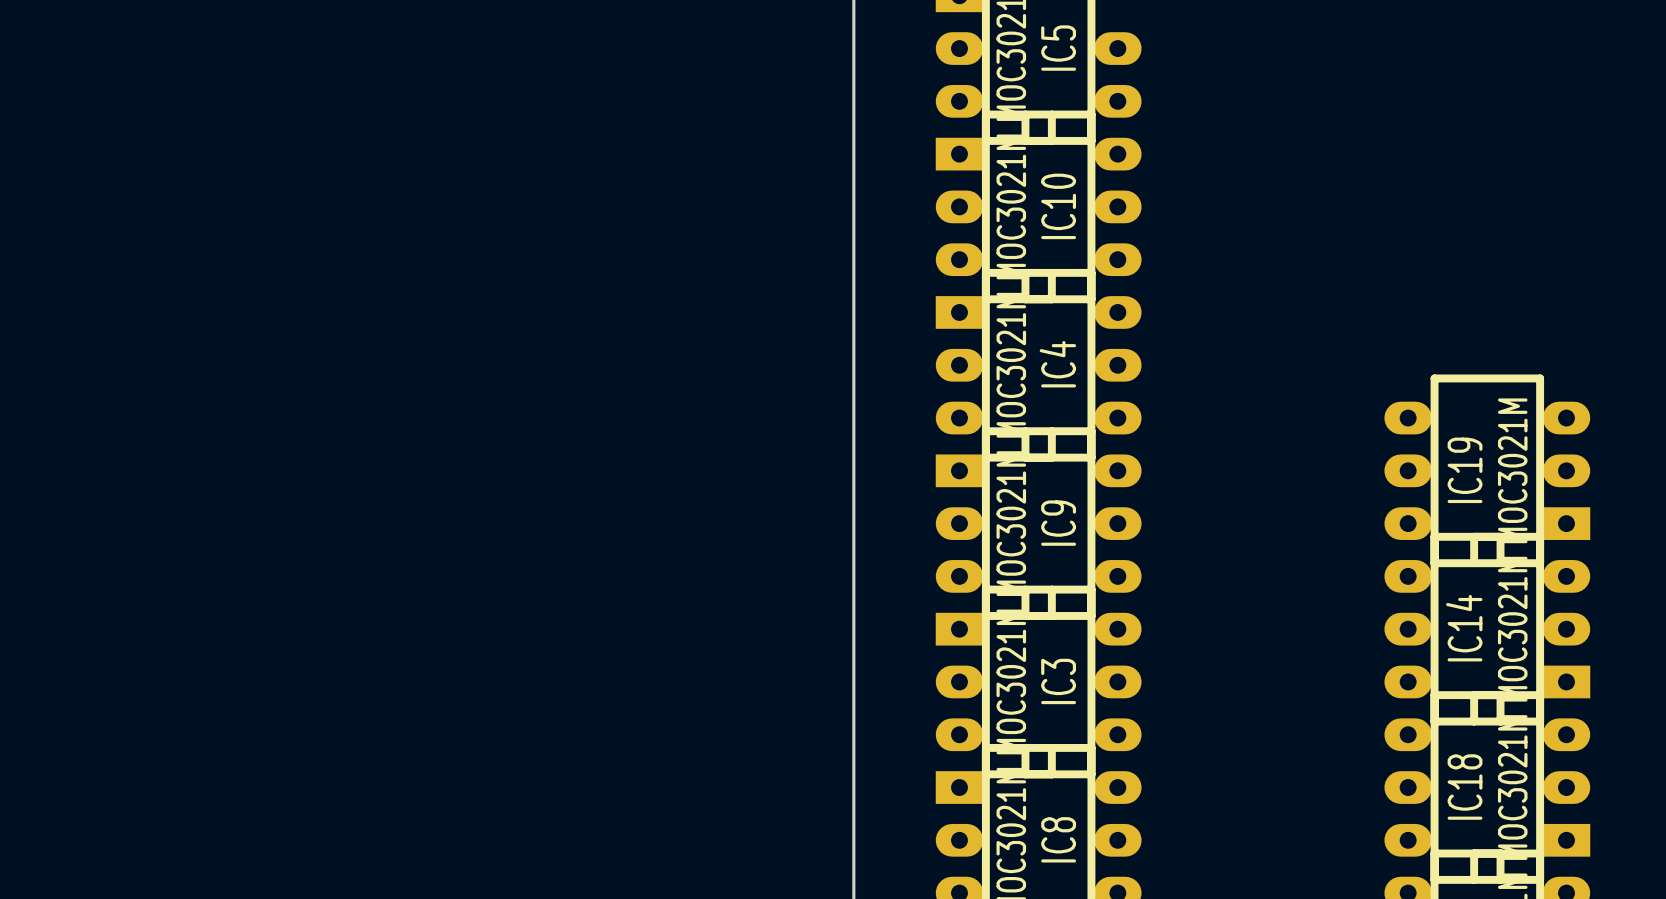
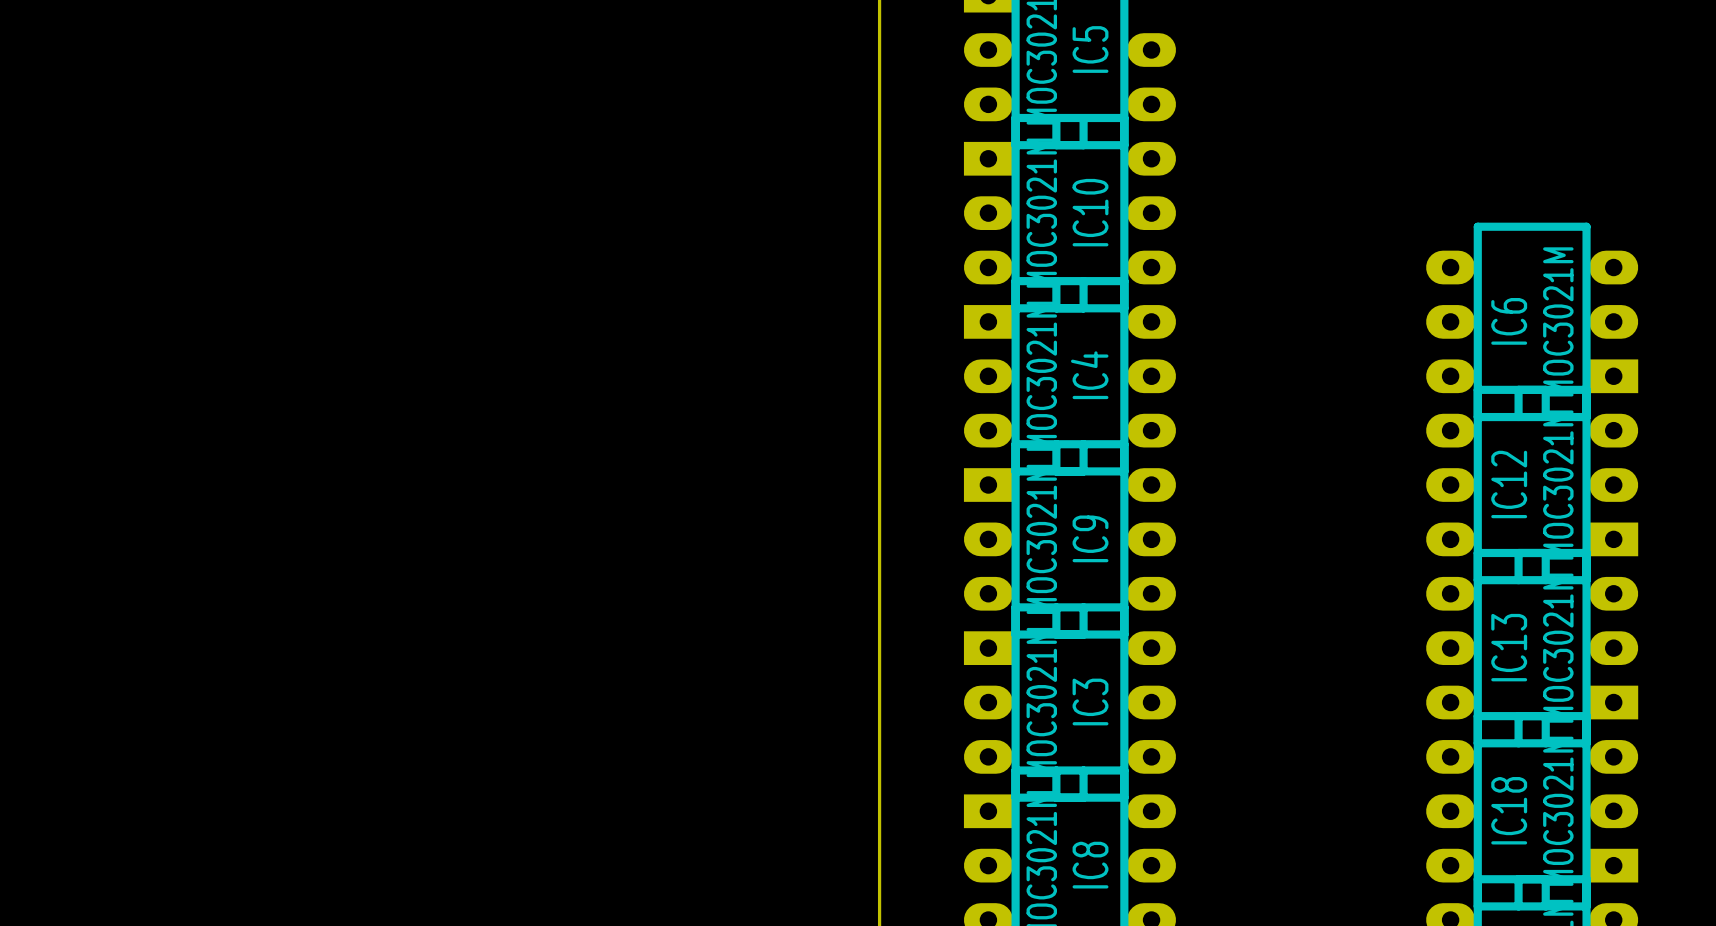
IC6: none -> MOC3021M (1532, 321)
IC19 name: IC19 (1465, 470) -> IC12 (1509, 484)
IC14 name: IC14 (1464, 628) -> IC13 (1509, 647)

